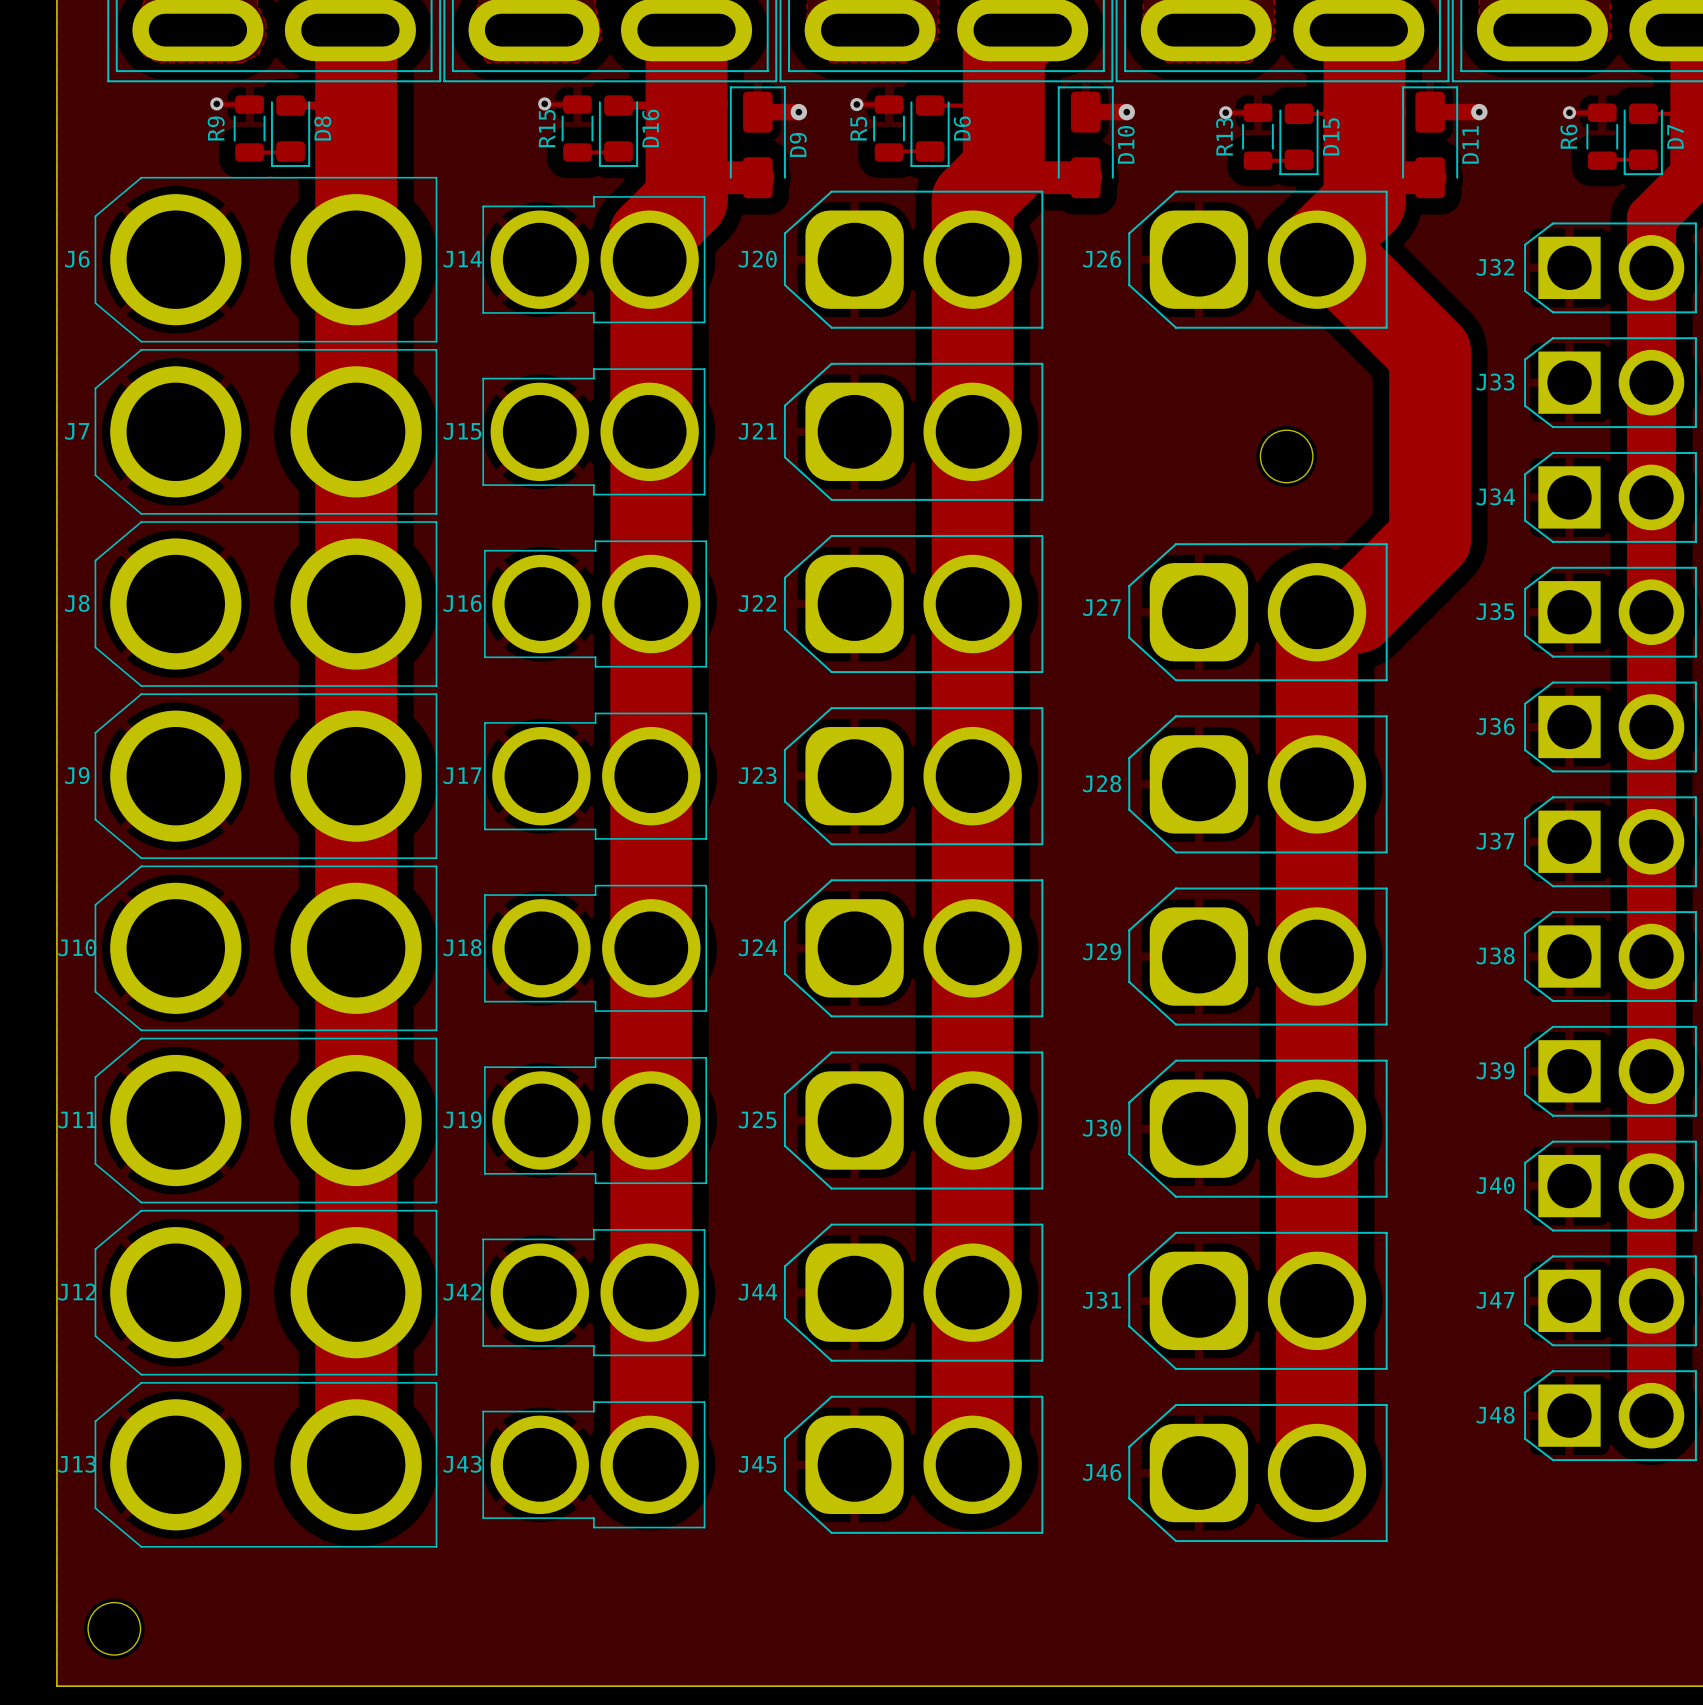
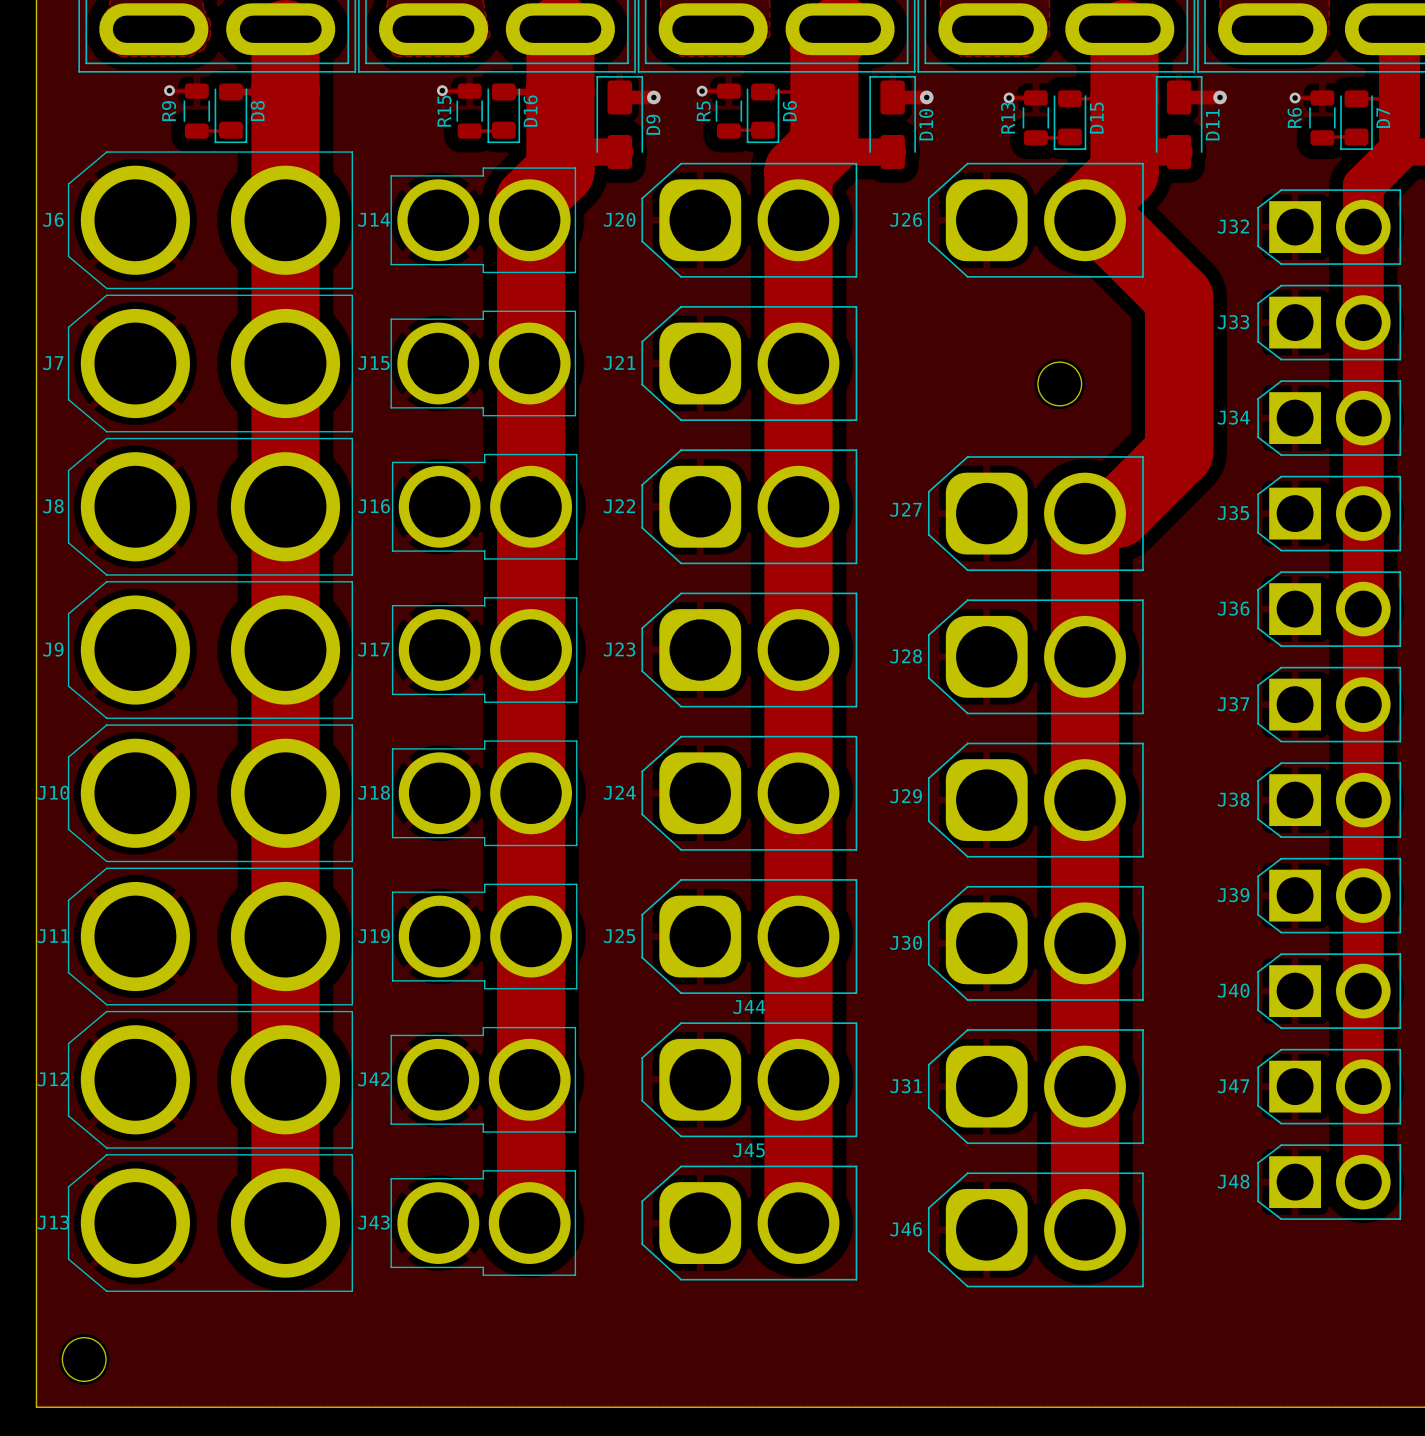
J44 name position: J44 (757, 1292) -> J44 (749, 1007)
J45 name position: J45 (757, 1464) -> J45 (749, 1150)

